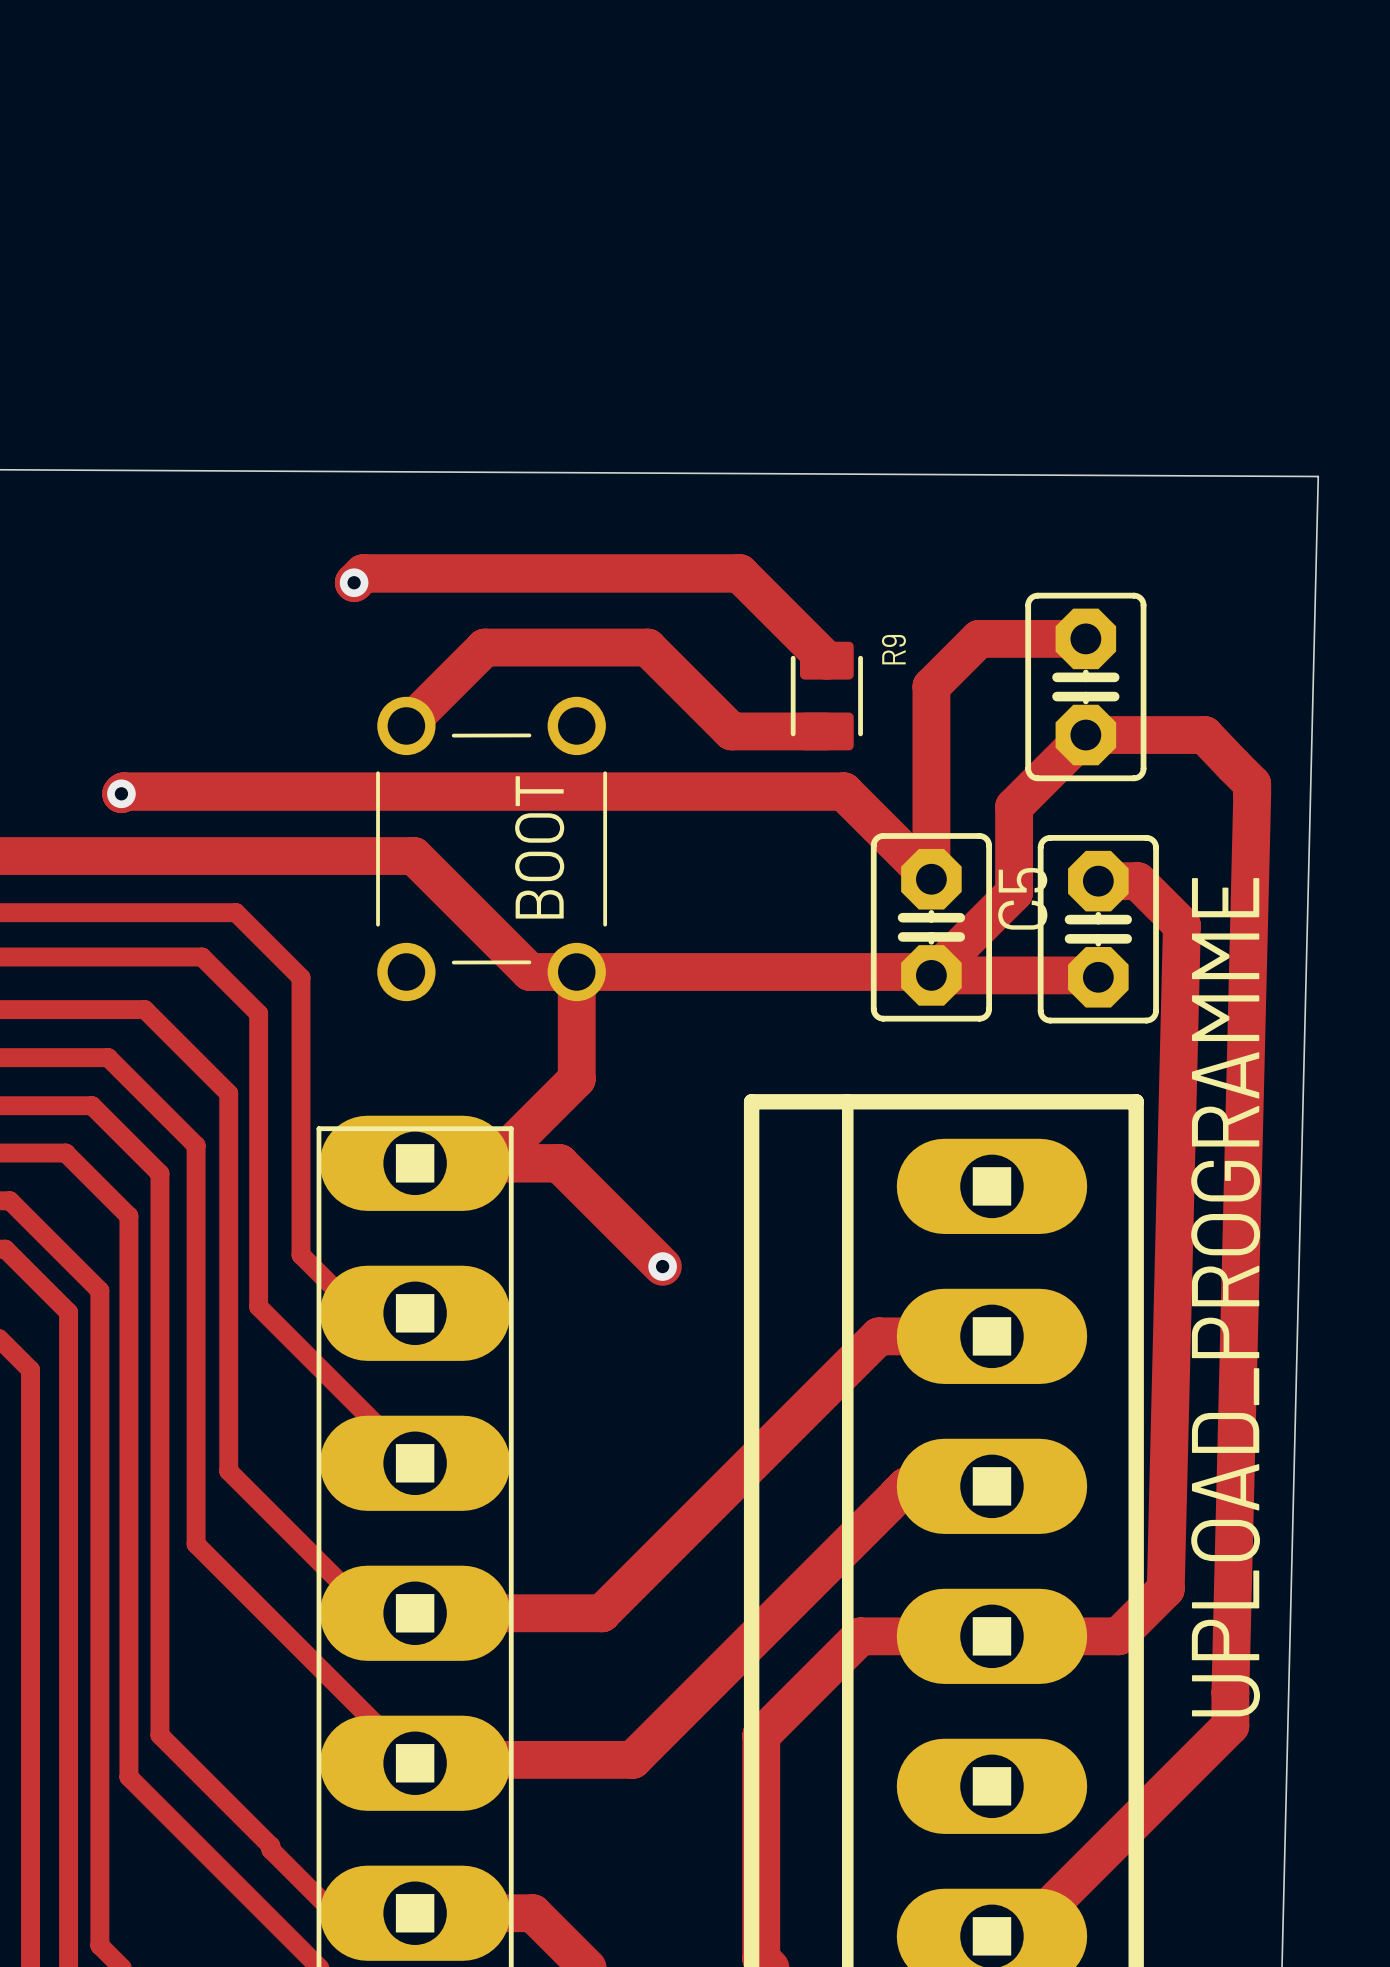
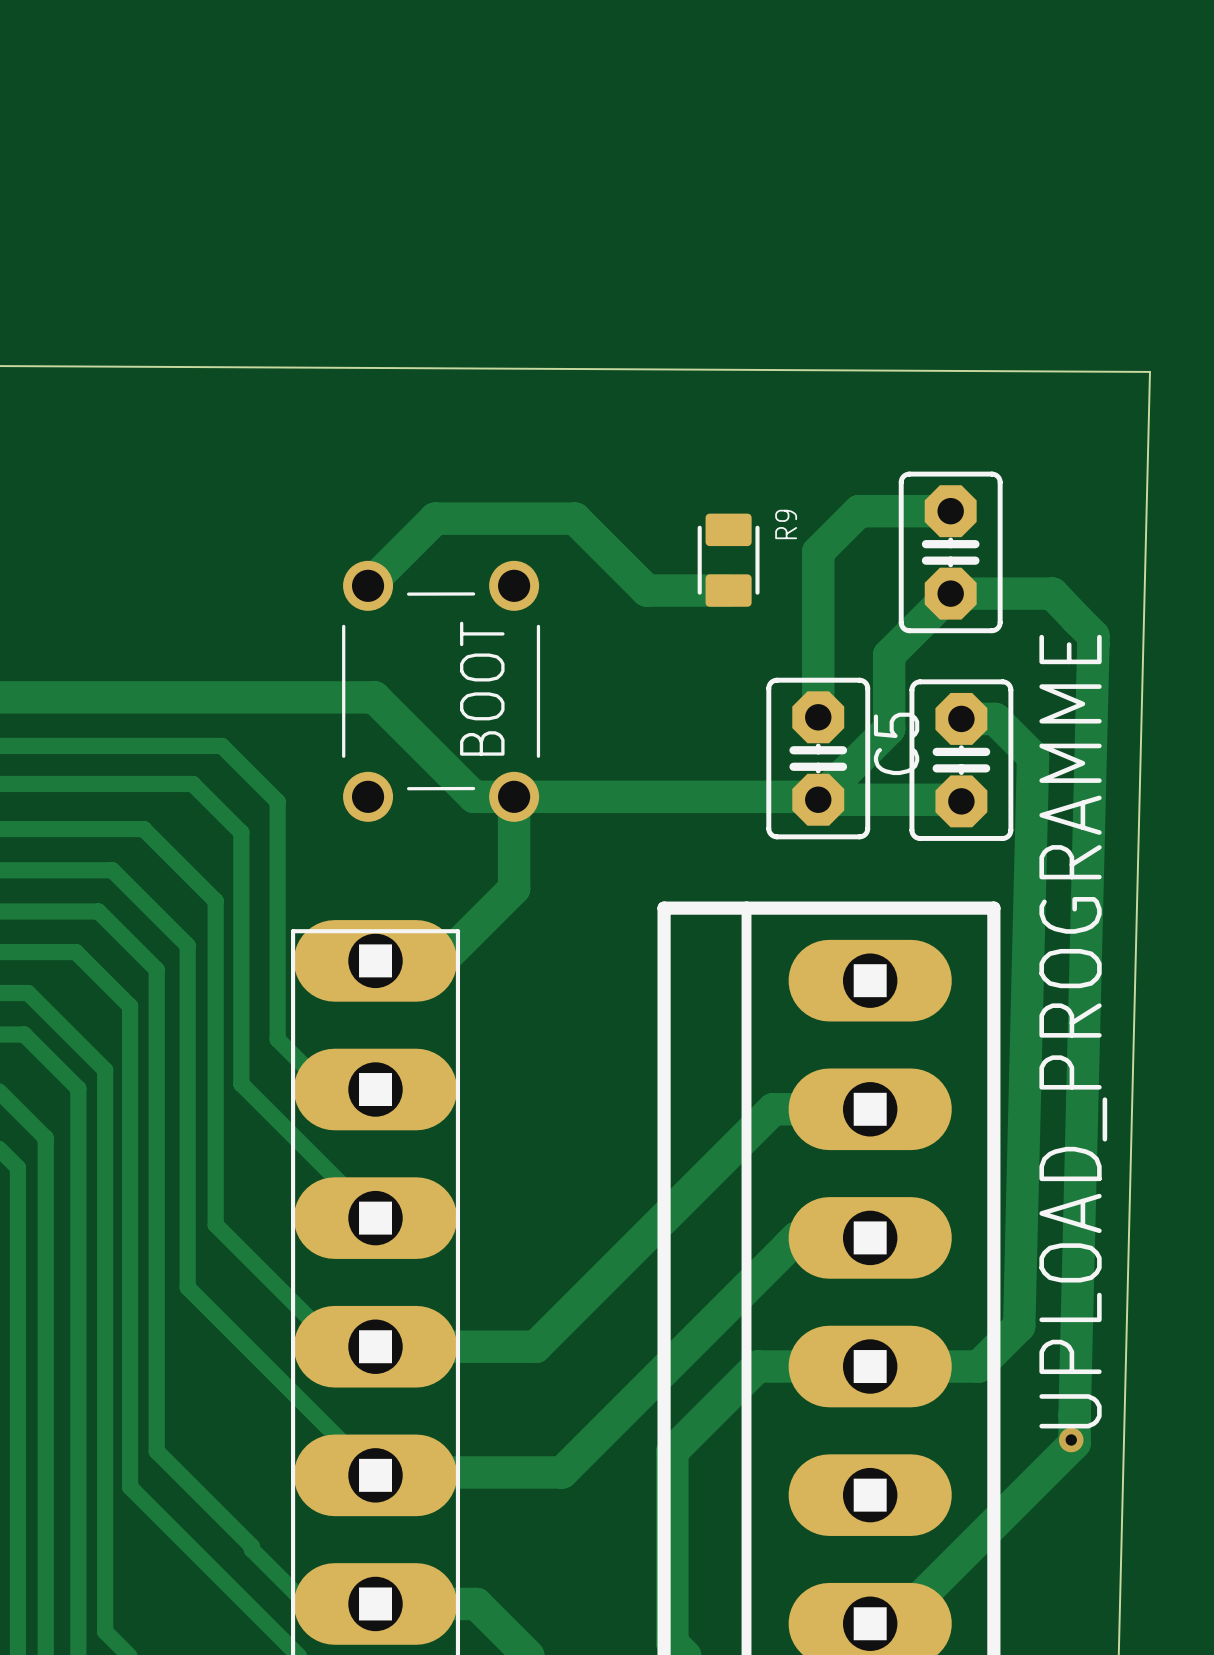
track: (354, 582) (363, 573) (739, 573) (826, 660) -> none
via: (354, 582) -> none
track: (121, 793) (123, 791) (843, 791) (931, 879) -> none
via: (121, 793) -> none
track: (415, 1163) (559, 1163) (662, 1266) -> none
via: (662, 1266) -> none
via: none -> (1071, 1439)

